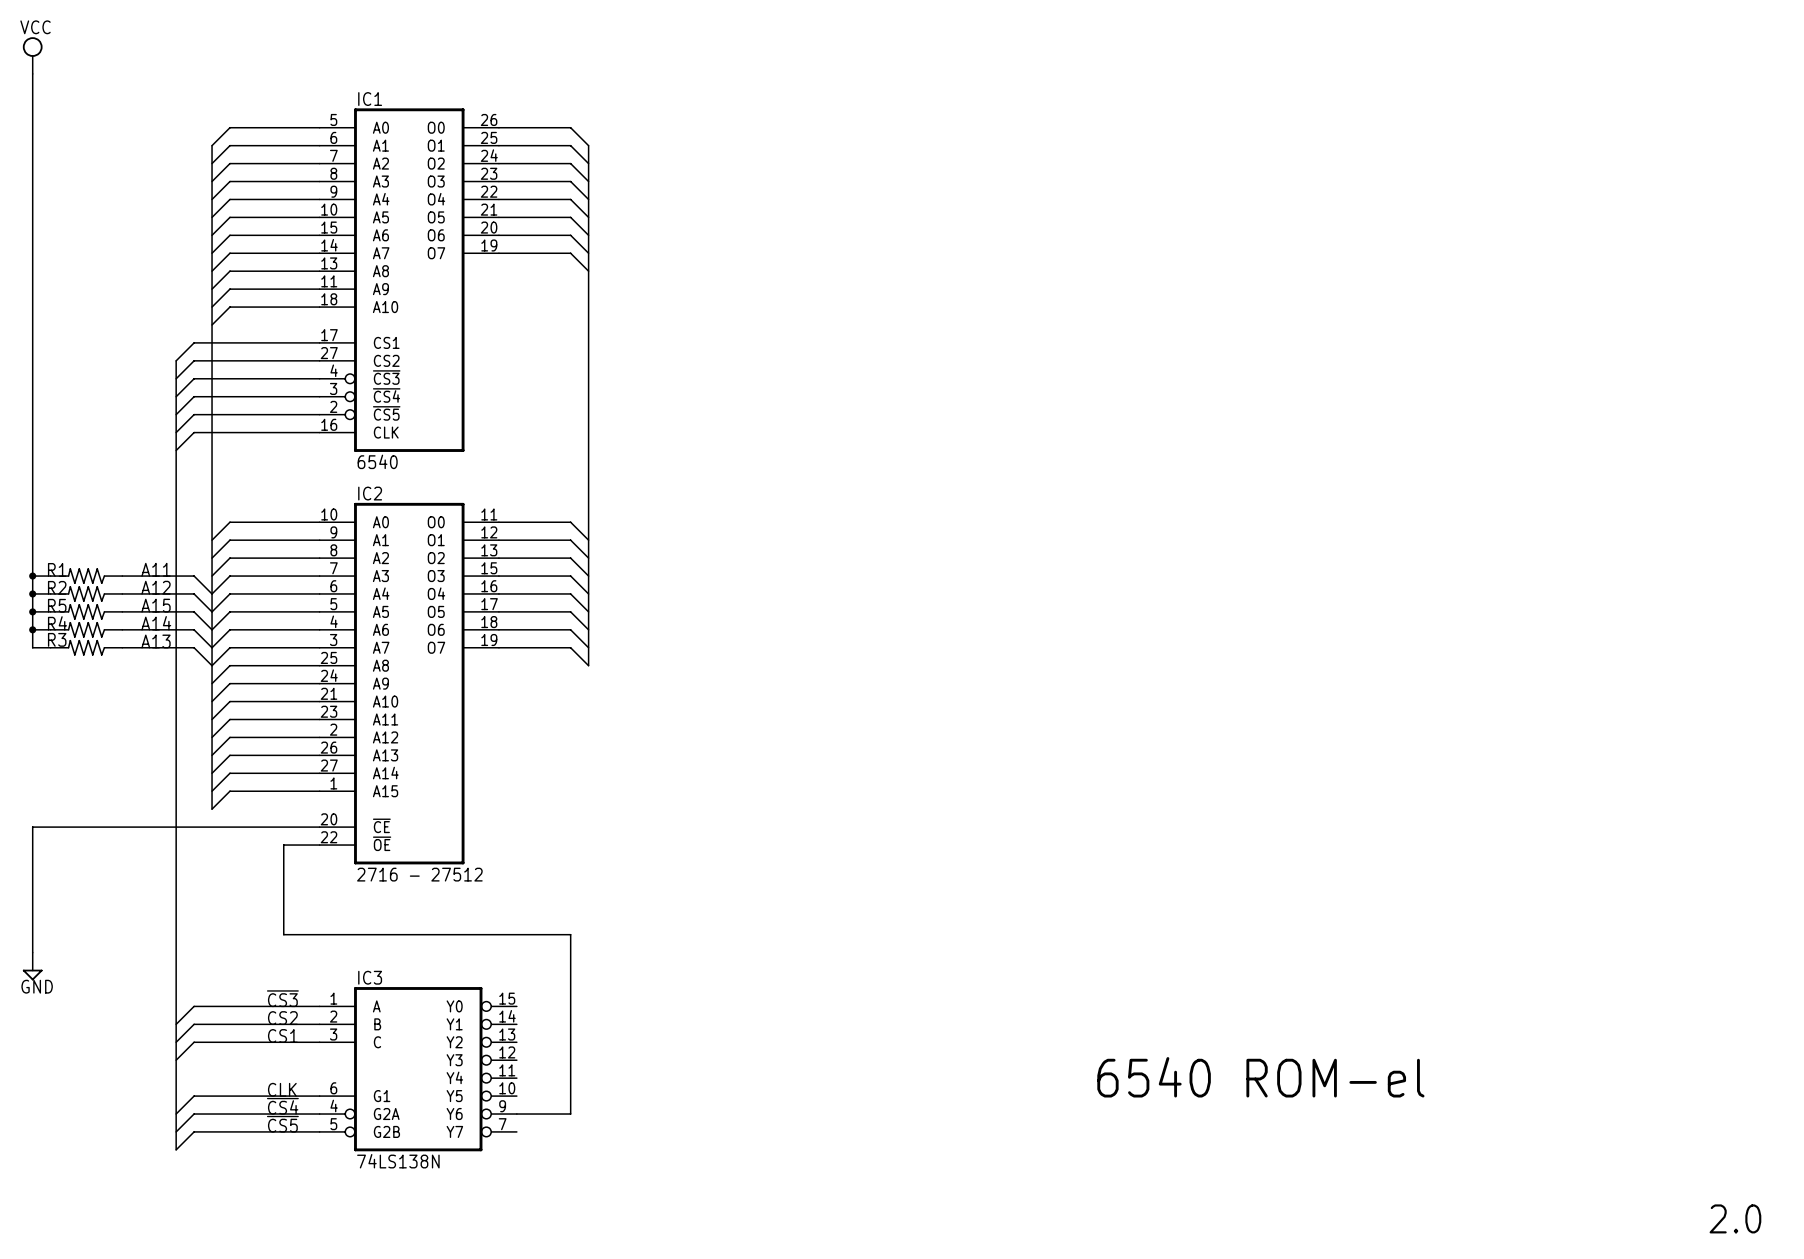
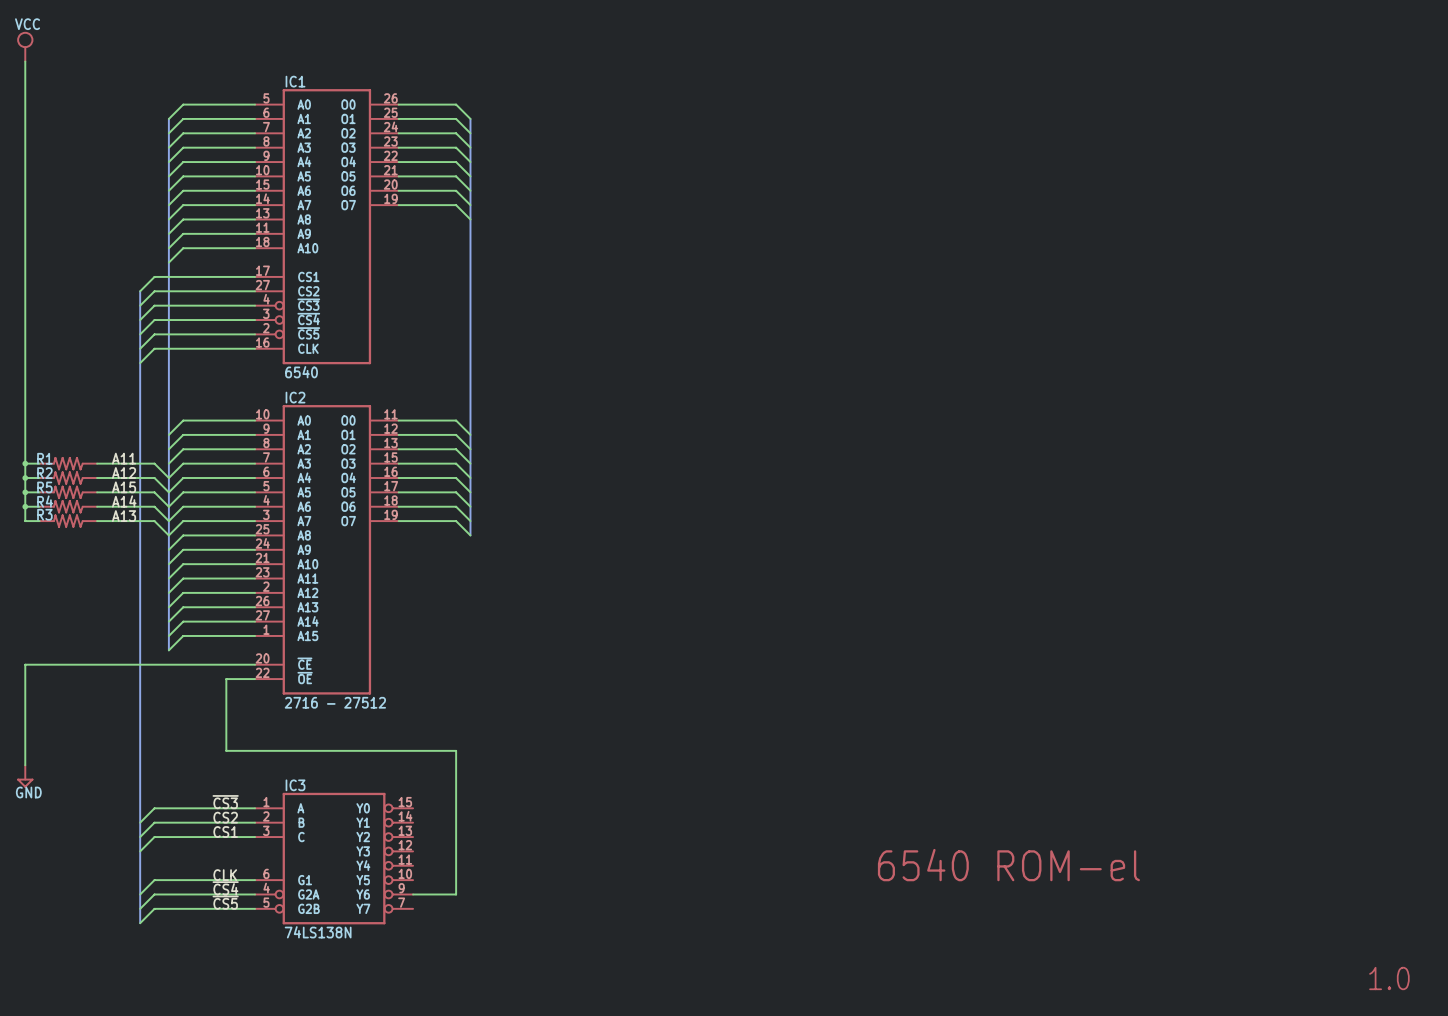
text: 2.0 (1735, 1218) -> 1.0 (1389, 978)

